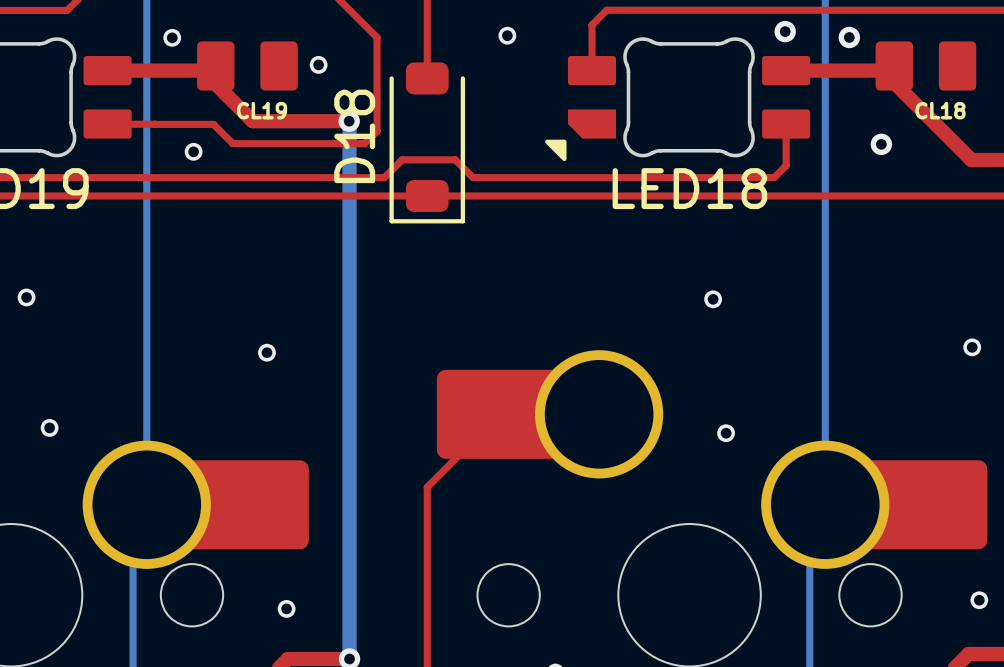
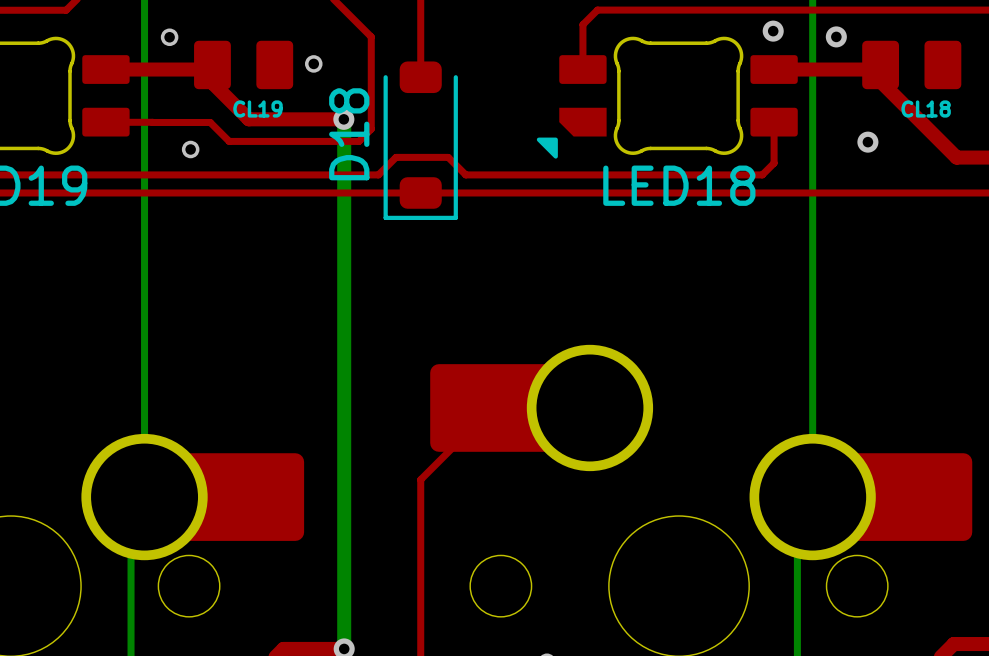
via: (507, 35) -> none
via: (26, 297) -> none
via: (713, 299) -> none
via: (972, 347) -> none
via: (266, 352) -> none
via: (49, 427) -> none
via: (726, 433) -> none
via: (979, 600) -> none
via: (286, 608) -> none

